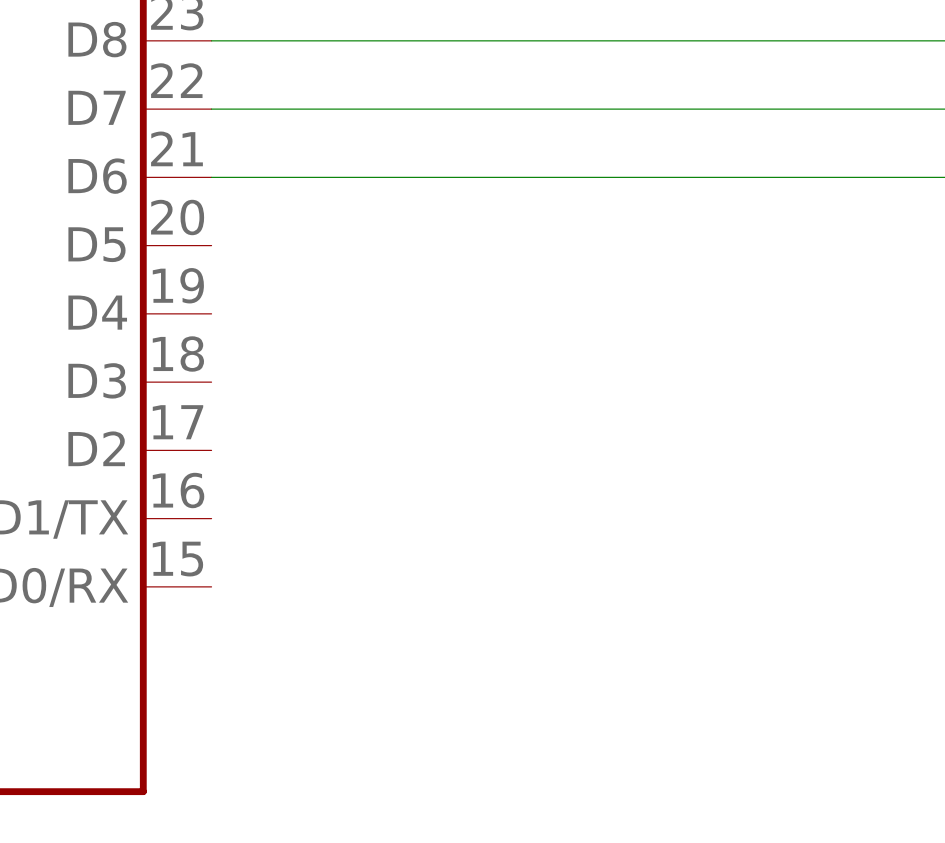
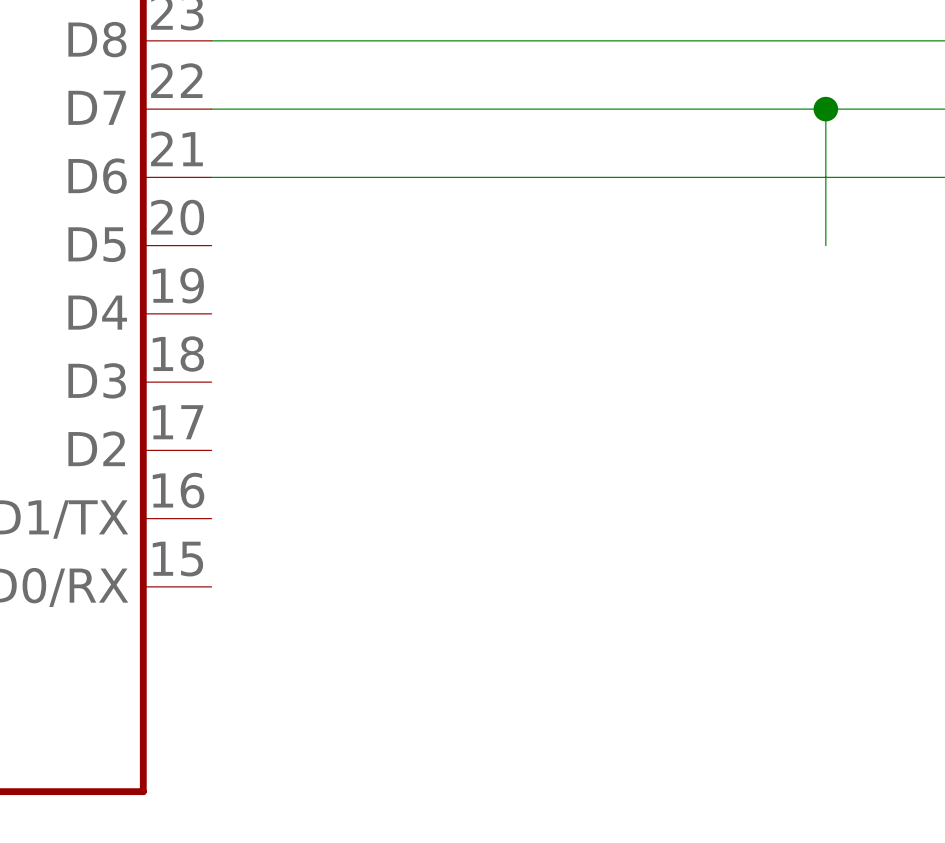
wire: none -> (825, 109) (825, 245)
junction: none -> (825, 109)

